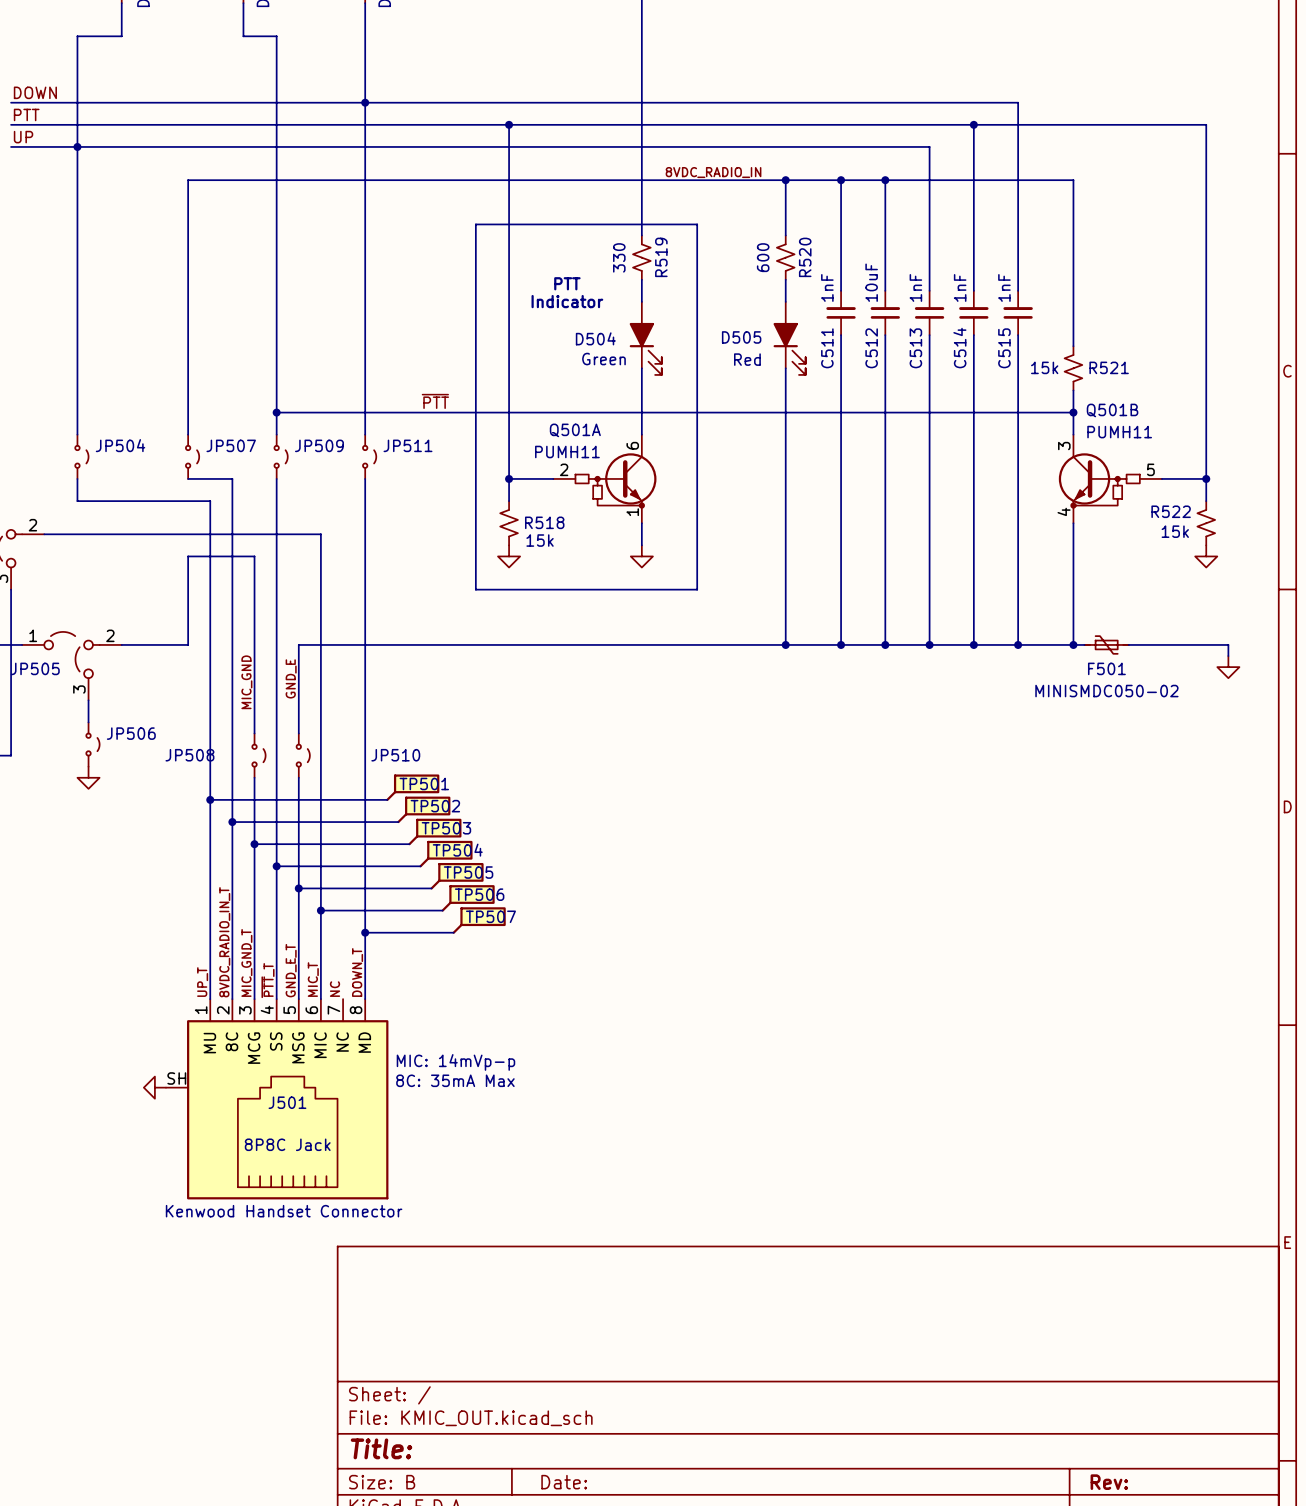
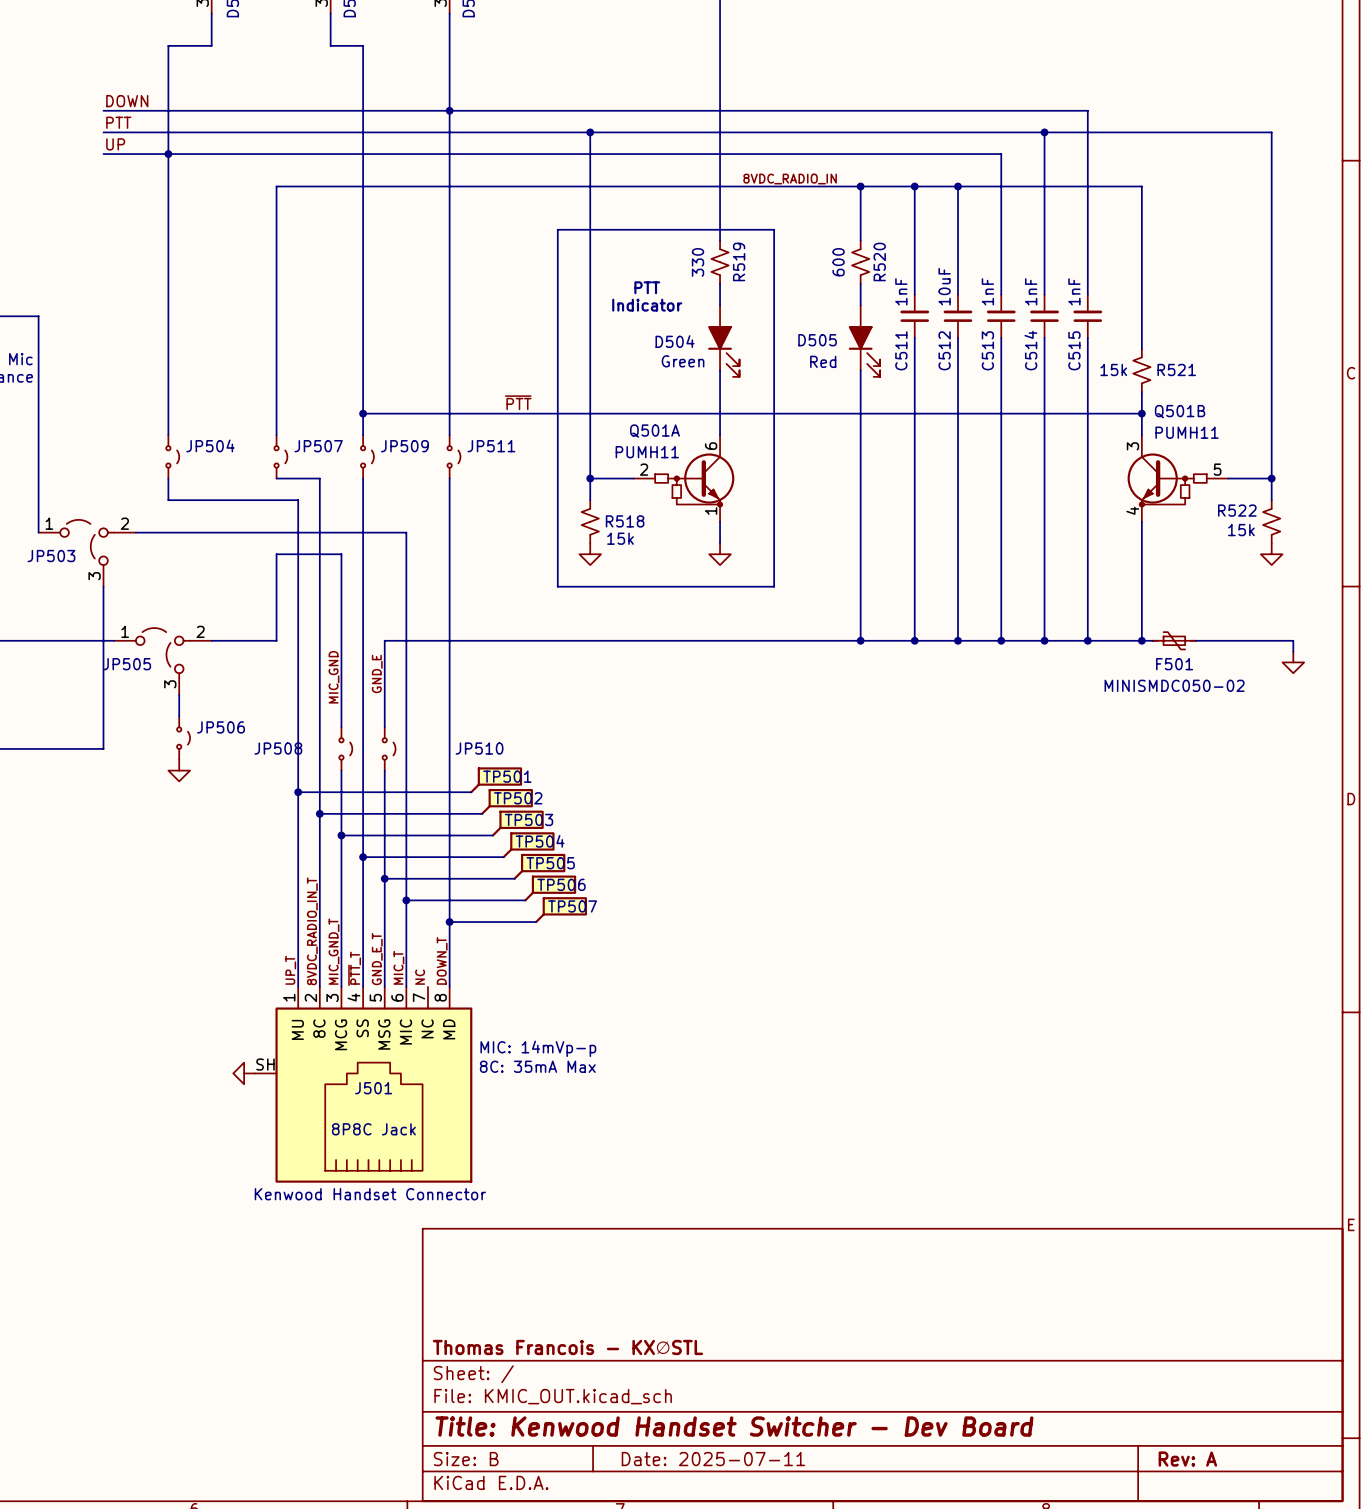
title block: none -> Thomas Francois - KX∅STL (567, 1347)
title block: Title: (381, 1448) -> Title: Kenwood Handset Switcher - Dev Board (734, 1426)
title block: Date: (564, 1482) -> Date: 2025-07-11 (713, 1459)
title block: Rev: (1109, 1482) -> Rev: A (1187, 1459)

